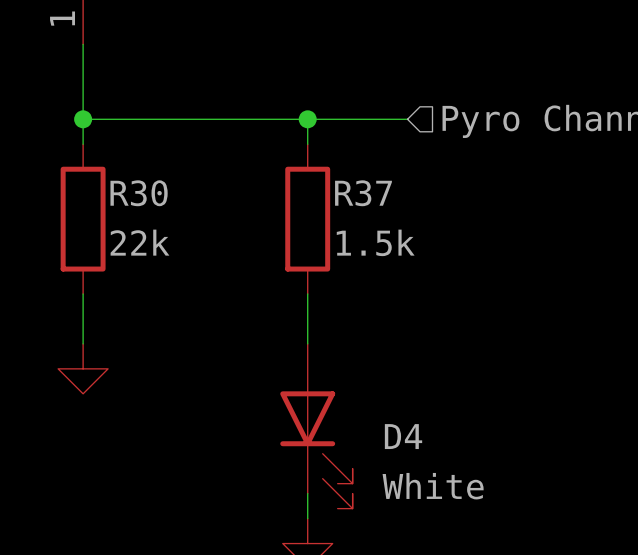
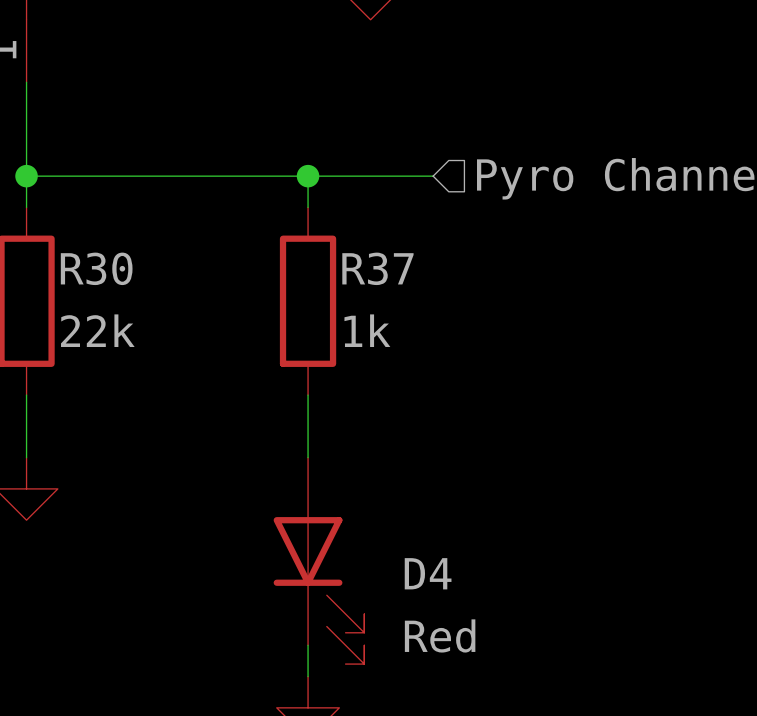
R37 value: 1.5k (375, 242) -> 1k (367, 330)
D4 value: White (433, 486) -> Red (440, 635)

